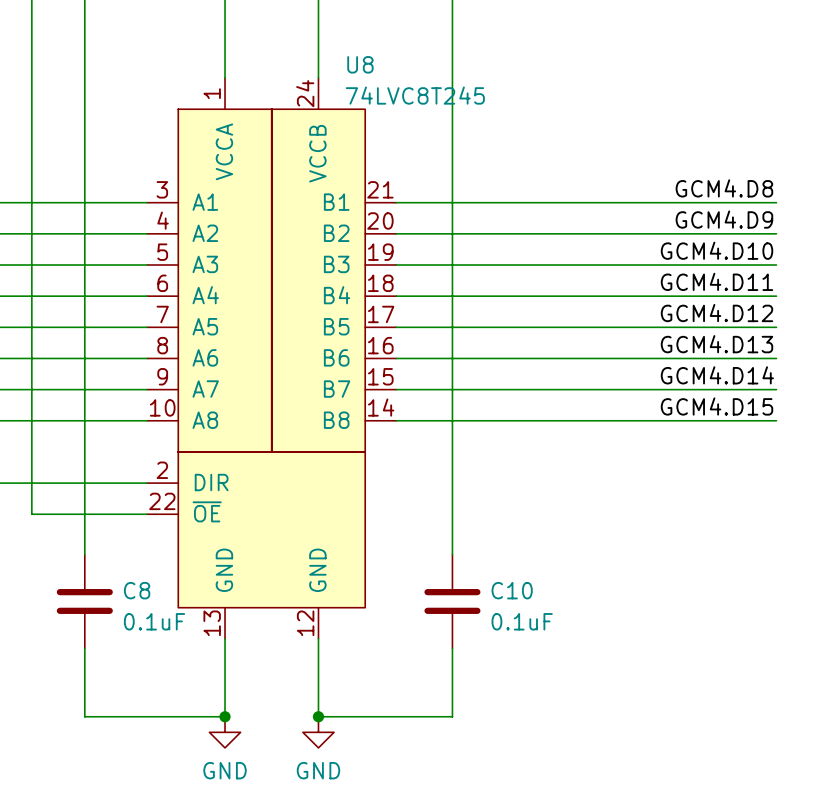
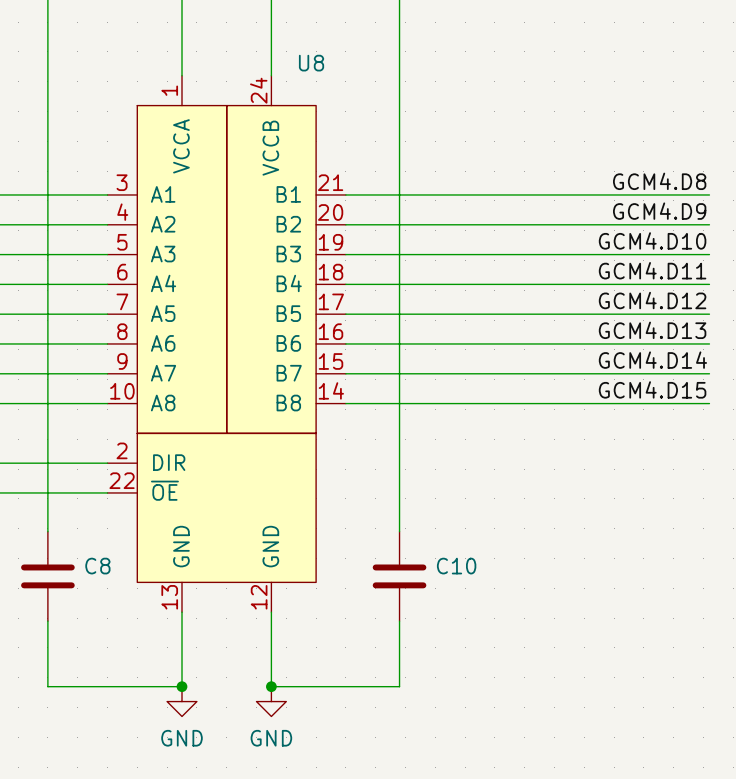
U8 value: 74LVC8T245 (415, 95) -> none
C8 value: 0.1uF (154, 621) -> none
C10 value: 0.1uF (522, 621) -> none

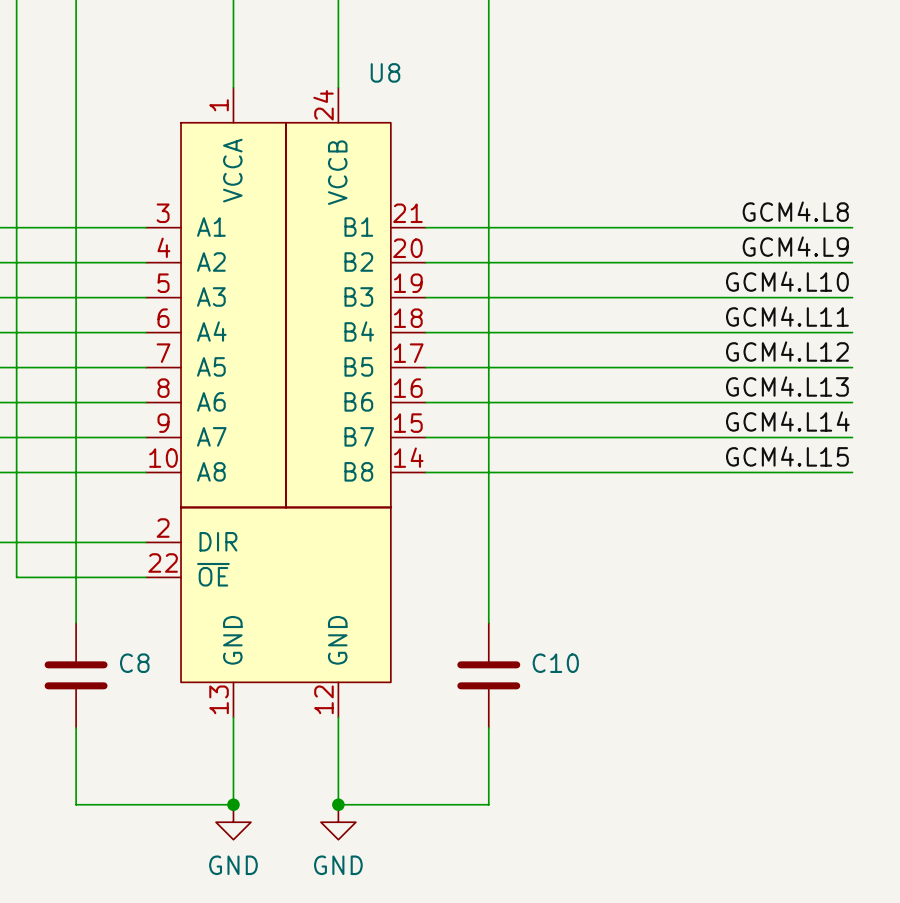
label: GCM4.D8 (659, 181) -> GCM4.L8 (795, 211)
label: GCM4.D9 (659, 211) -> GCM4.L9 (795, 246)
label: GCM4.D10 (652, 240) -> GCM4.L10 (787, 281)
label: GCM4.D11 (652, 270) -> GCM4.L11 (787, 316)
label: GCM4.D12 (652, 300) -> GCM4.L12 (787, 351)
label: GCM4.D13 (652, 330) -> GCM4.L13 (787, 386)
label: GCM4.D14 (652, 360) -> GCM4.L14 (787, 421)
label: GCM4.D15 (652, 389) -> GCM4.L15 (787, 456)

